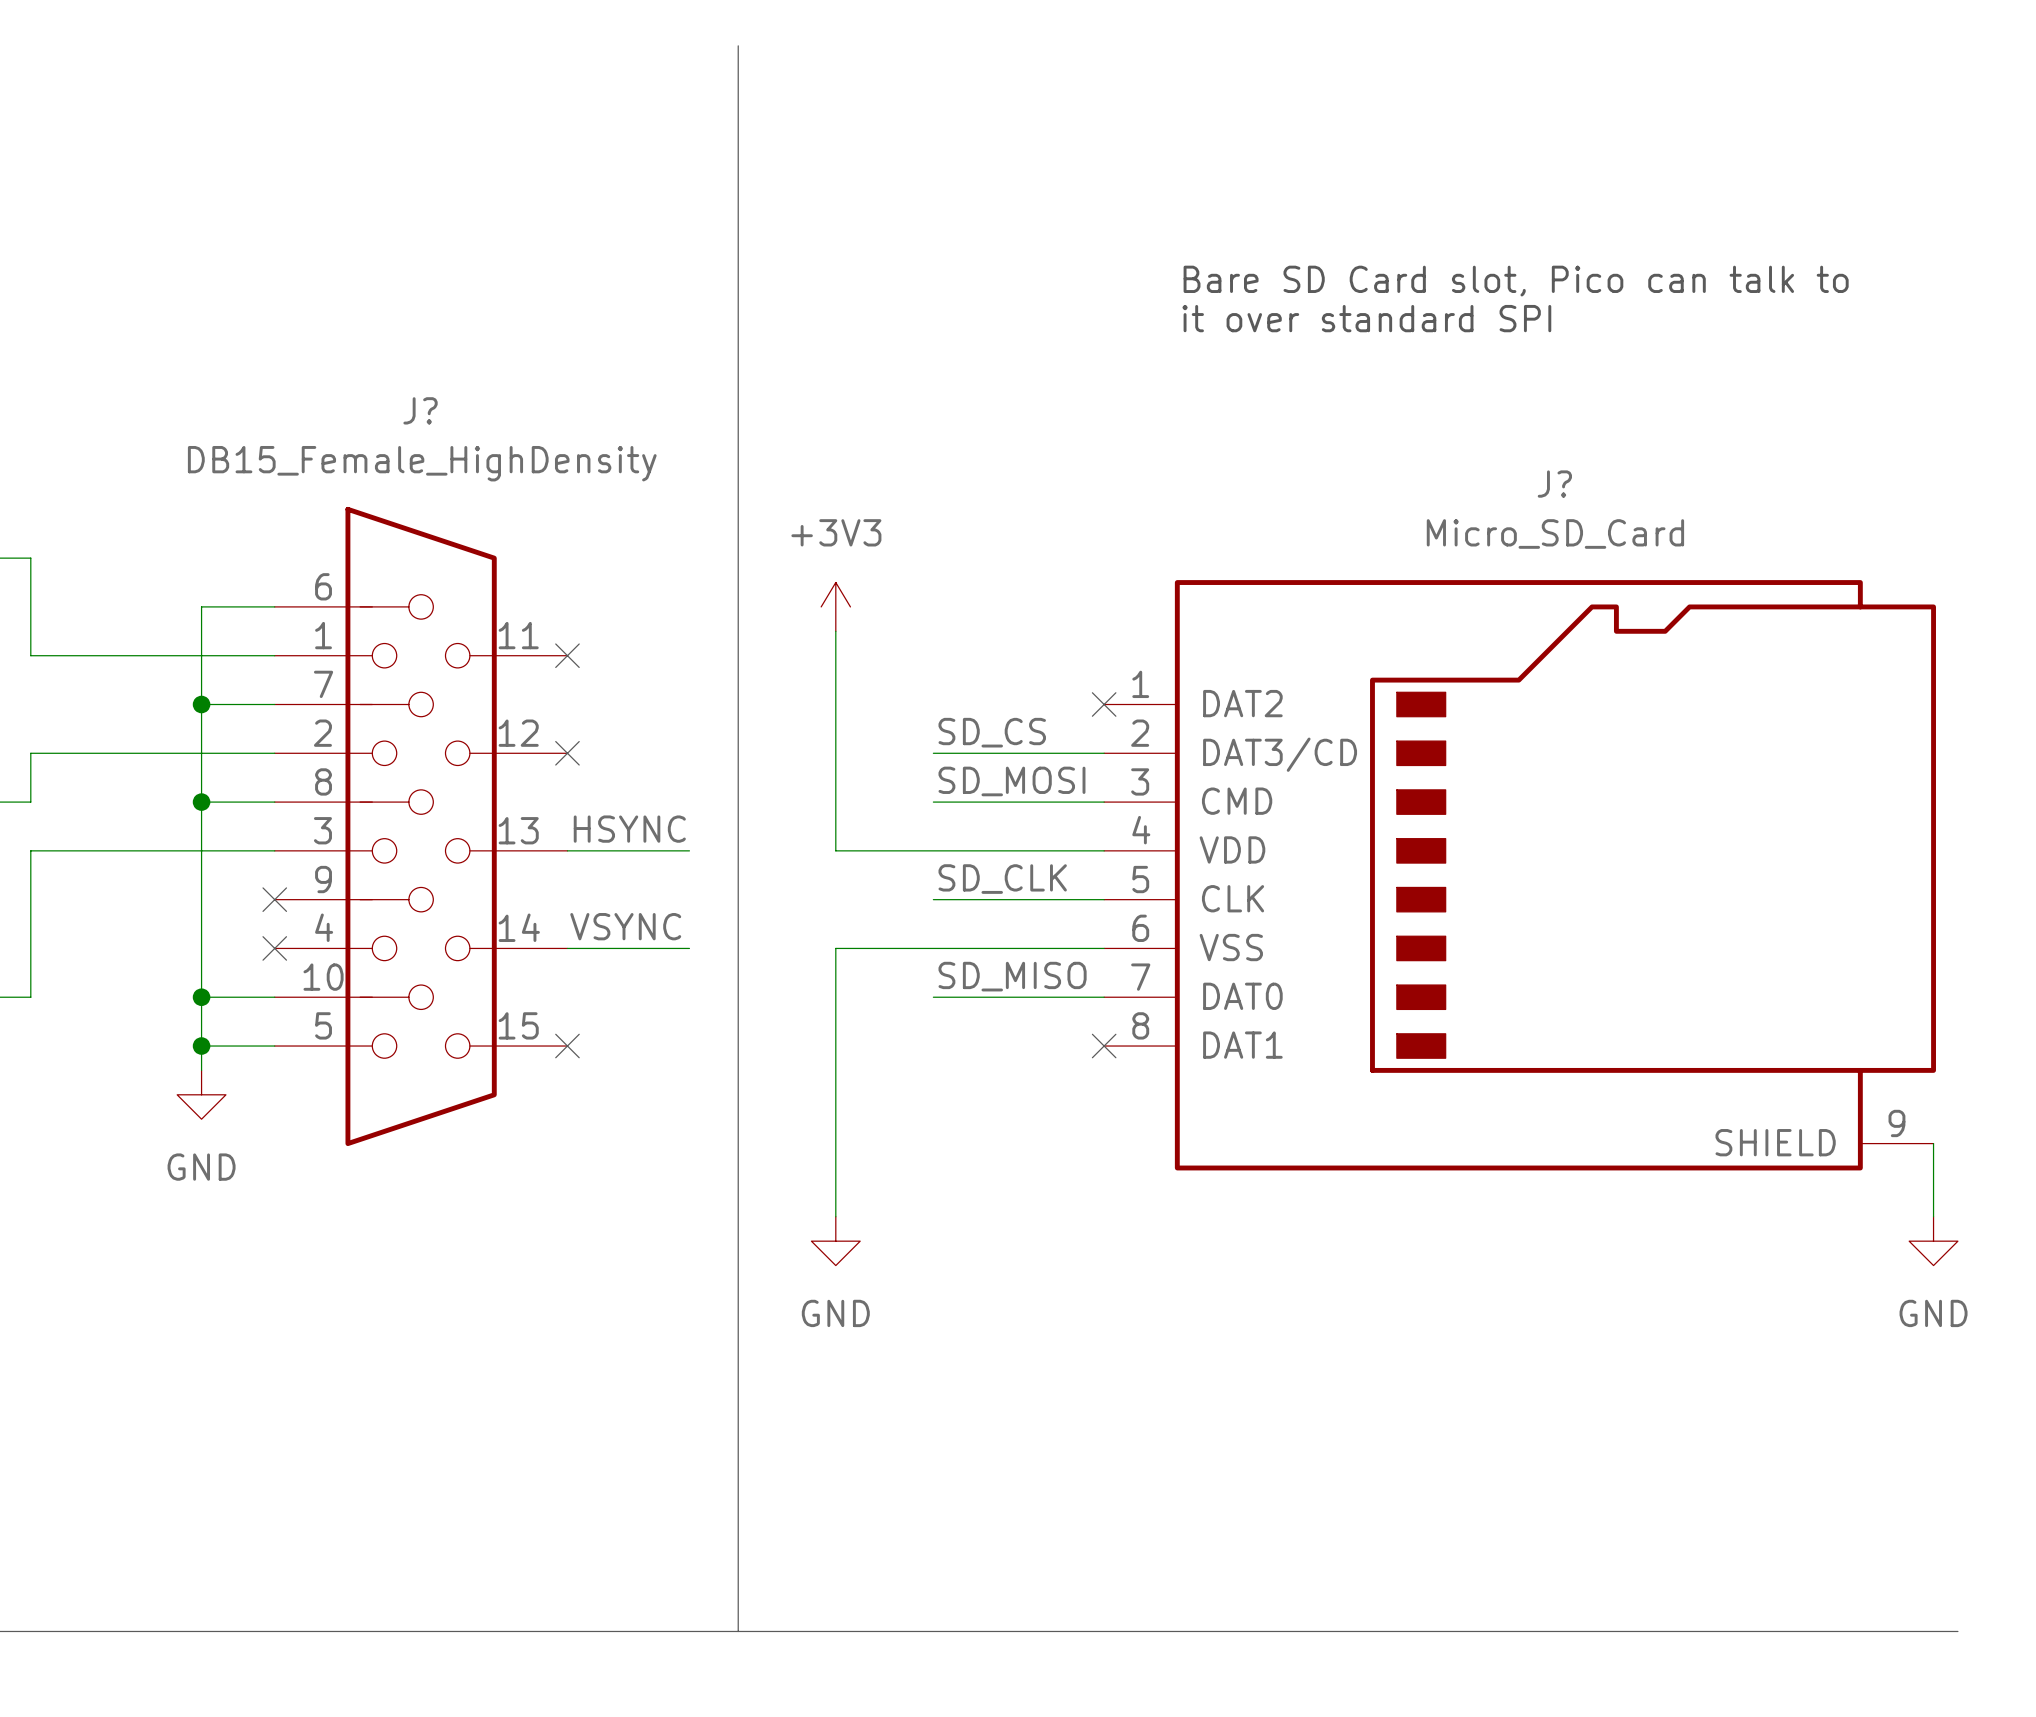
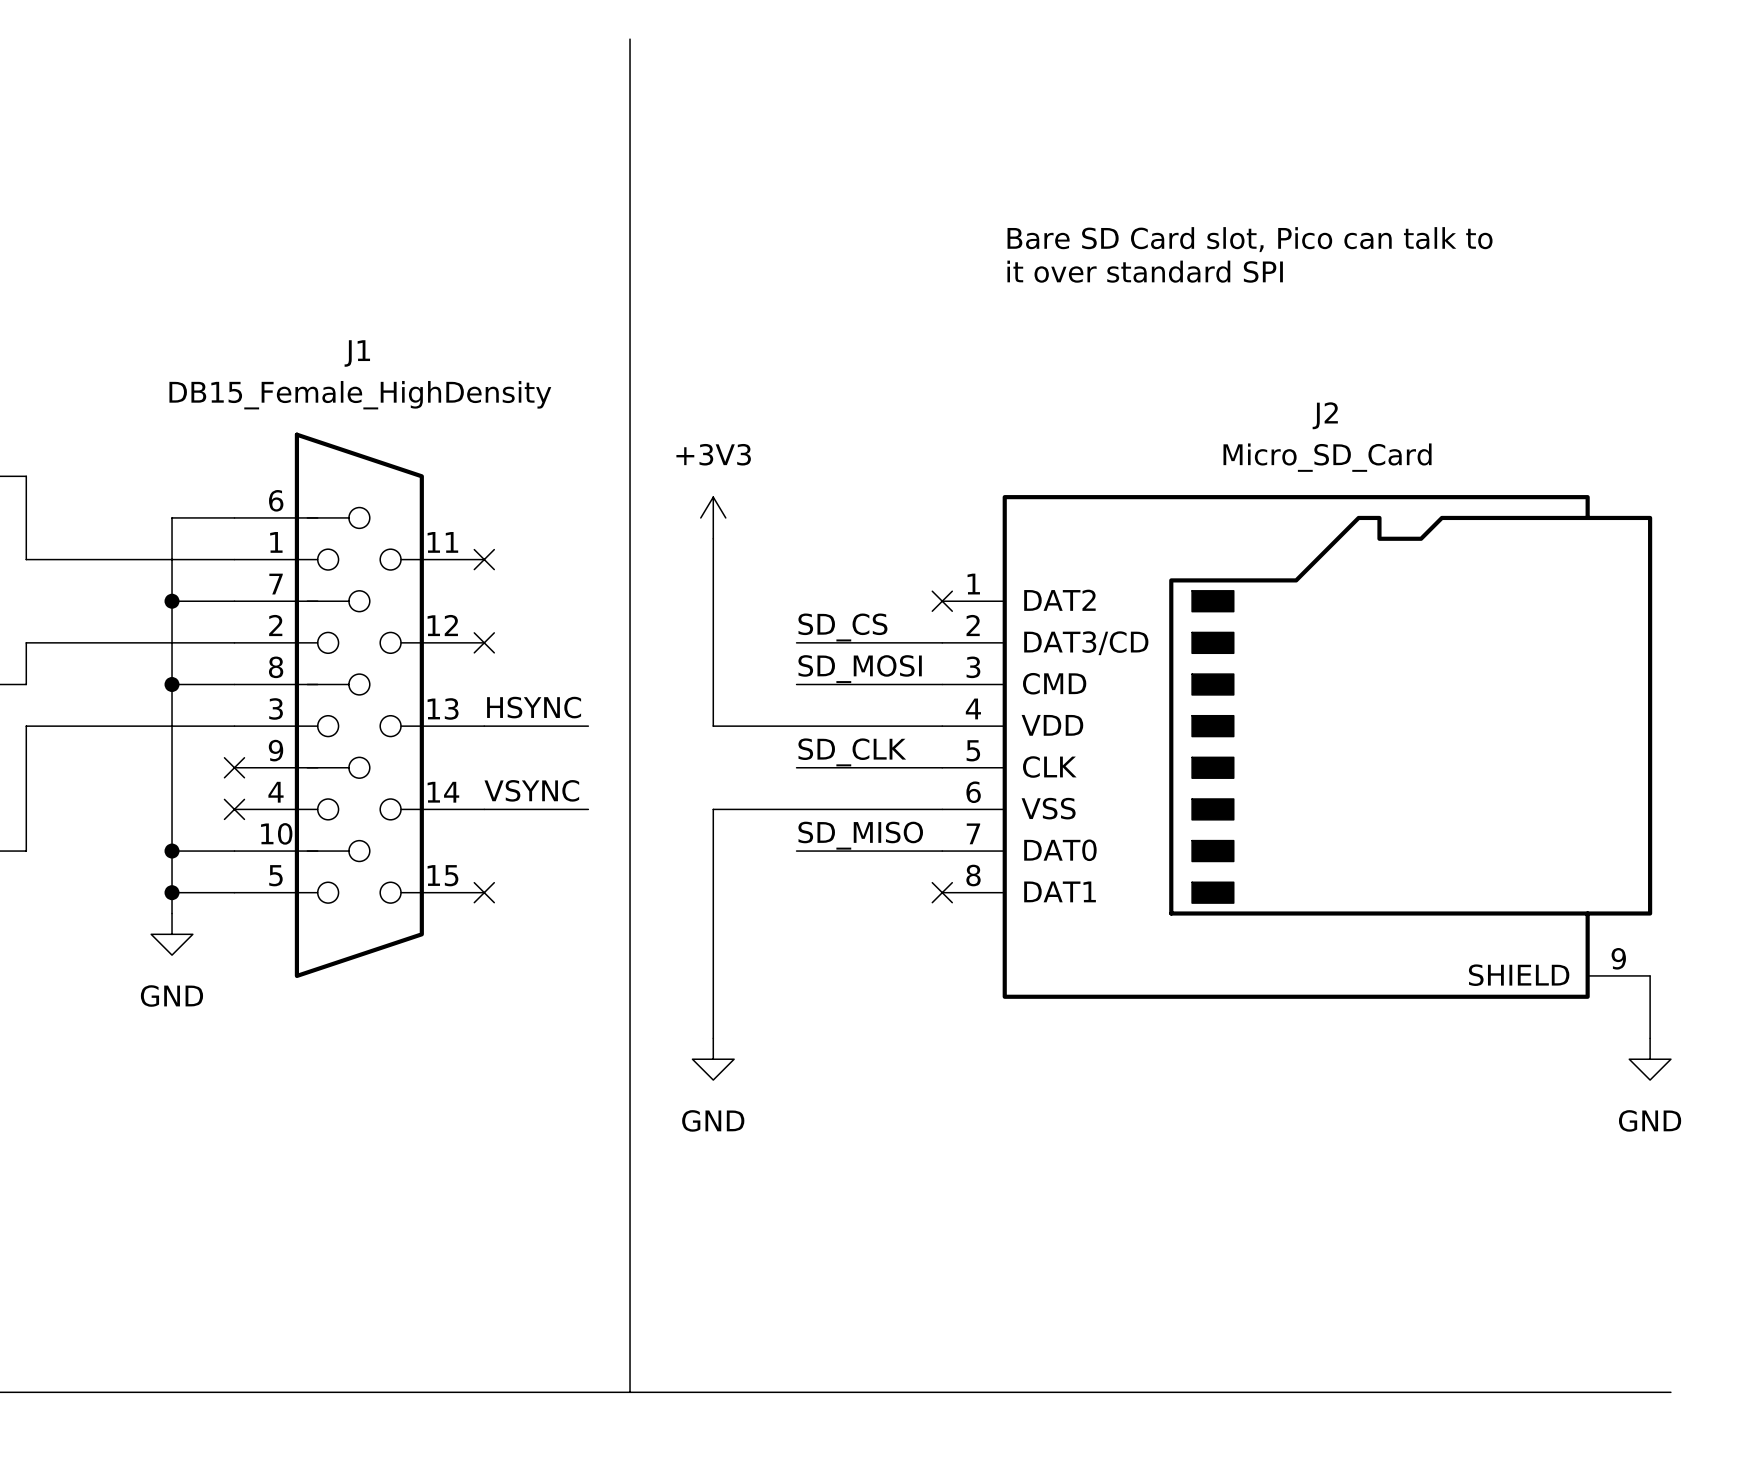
J? name: J? (420, 410) -> J1 (357, 353)
J? name: J? (1554, 484) -> J2 (1325, 415)

